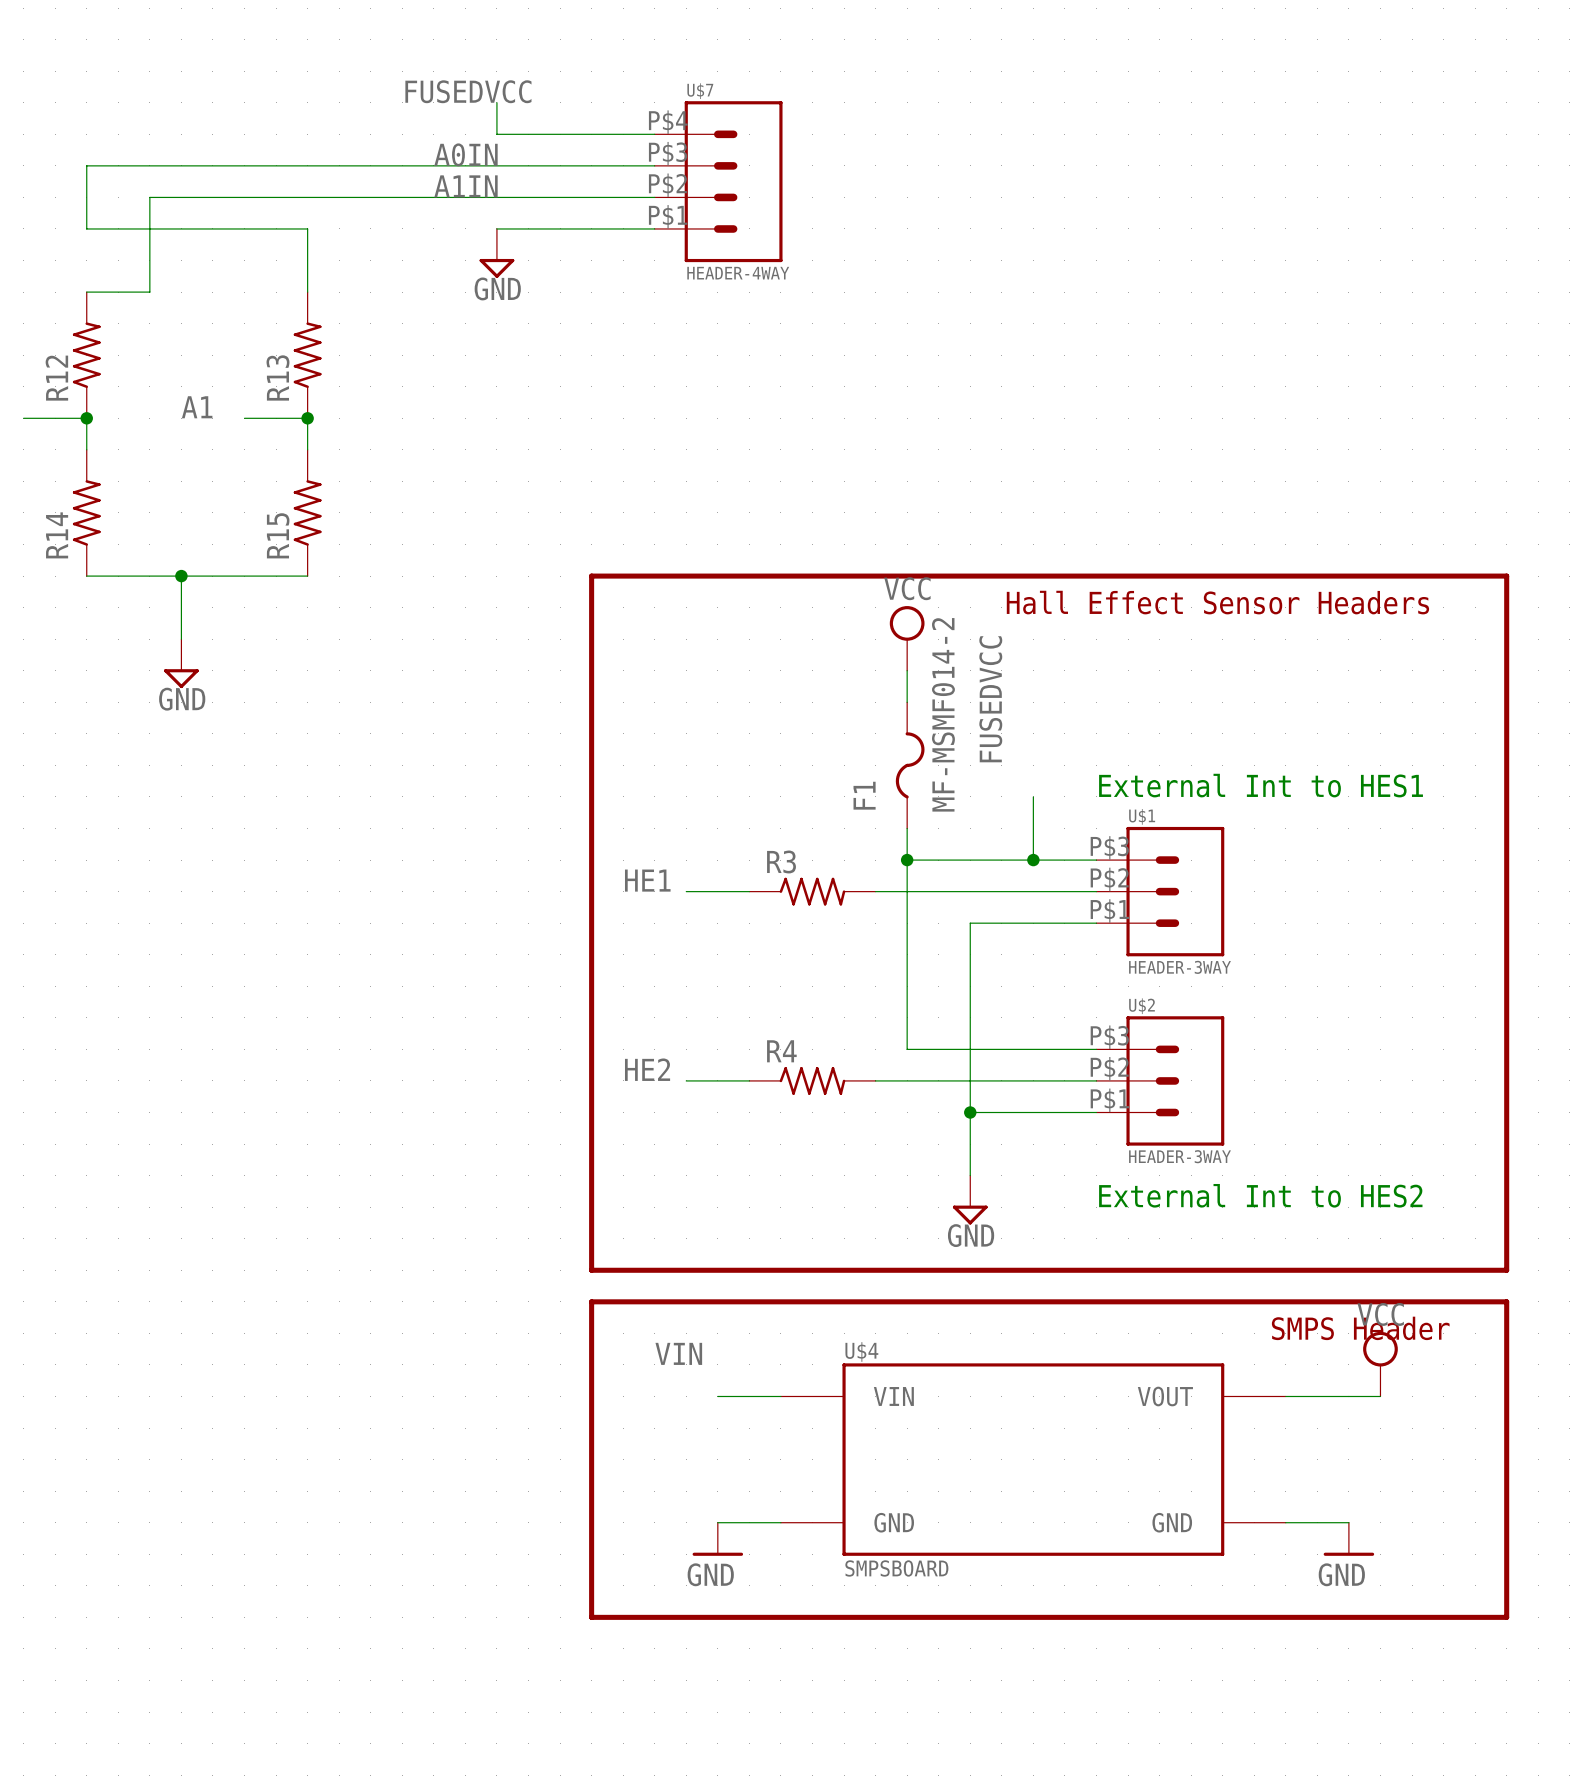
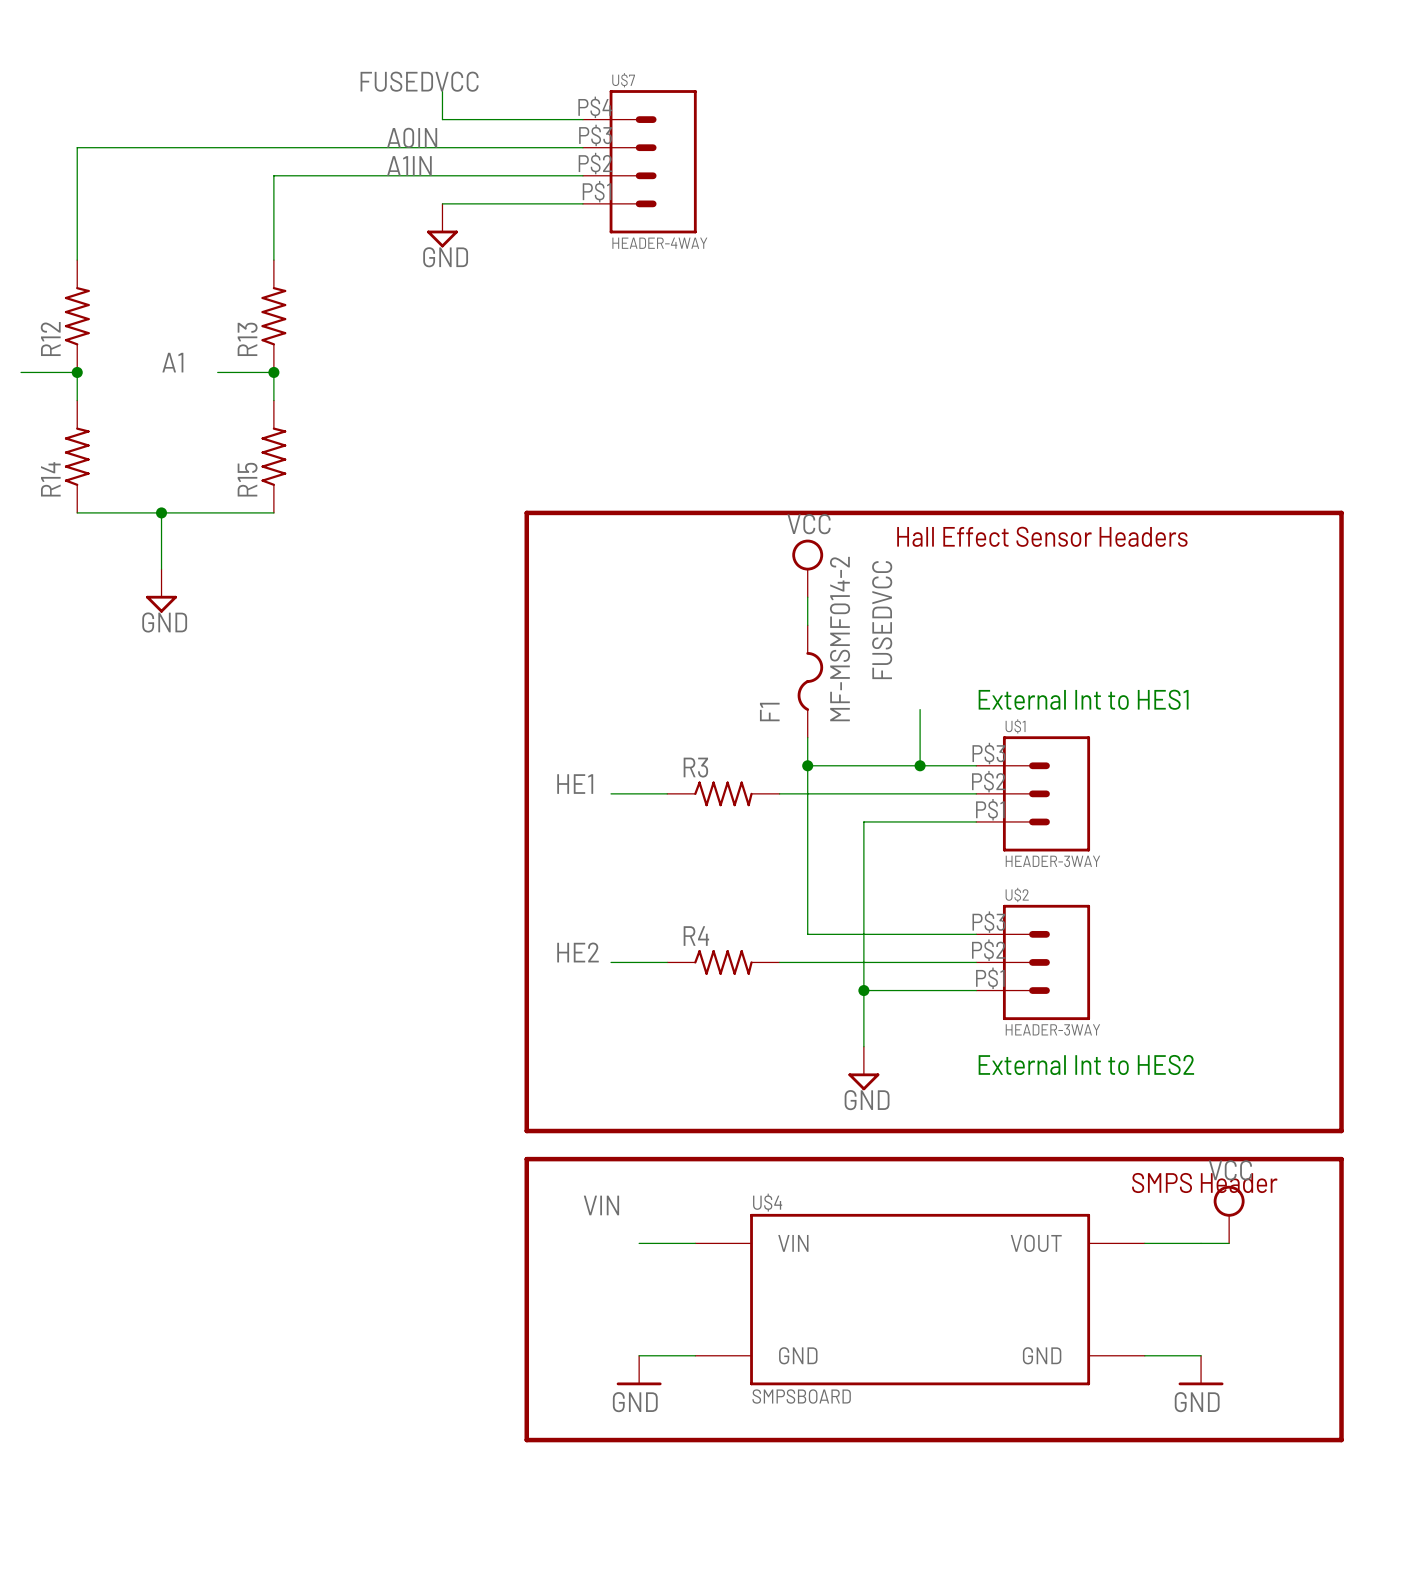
wire: (307, 197) (149, 197) (149, 292) (86, 292) -> (77, 203) (77, 260)
wire: (86, 228) (307, 228) -> (273, 175) (273, 203)

